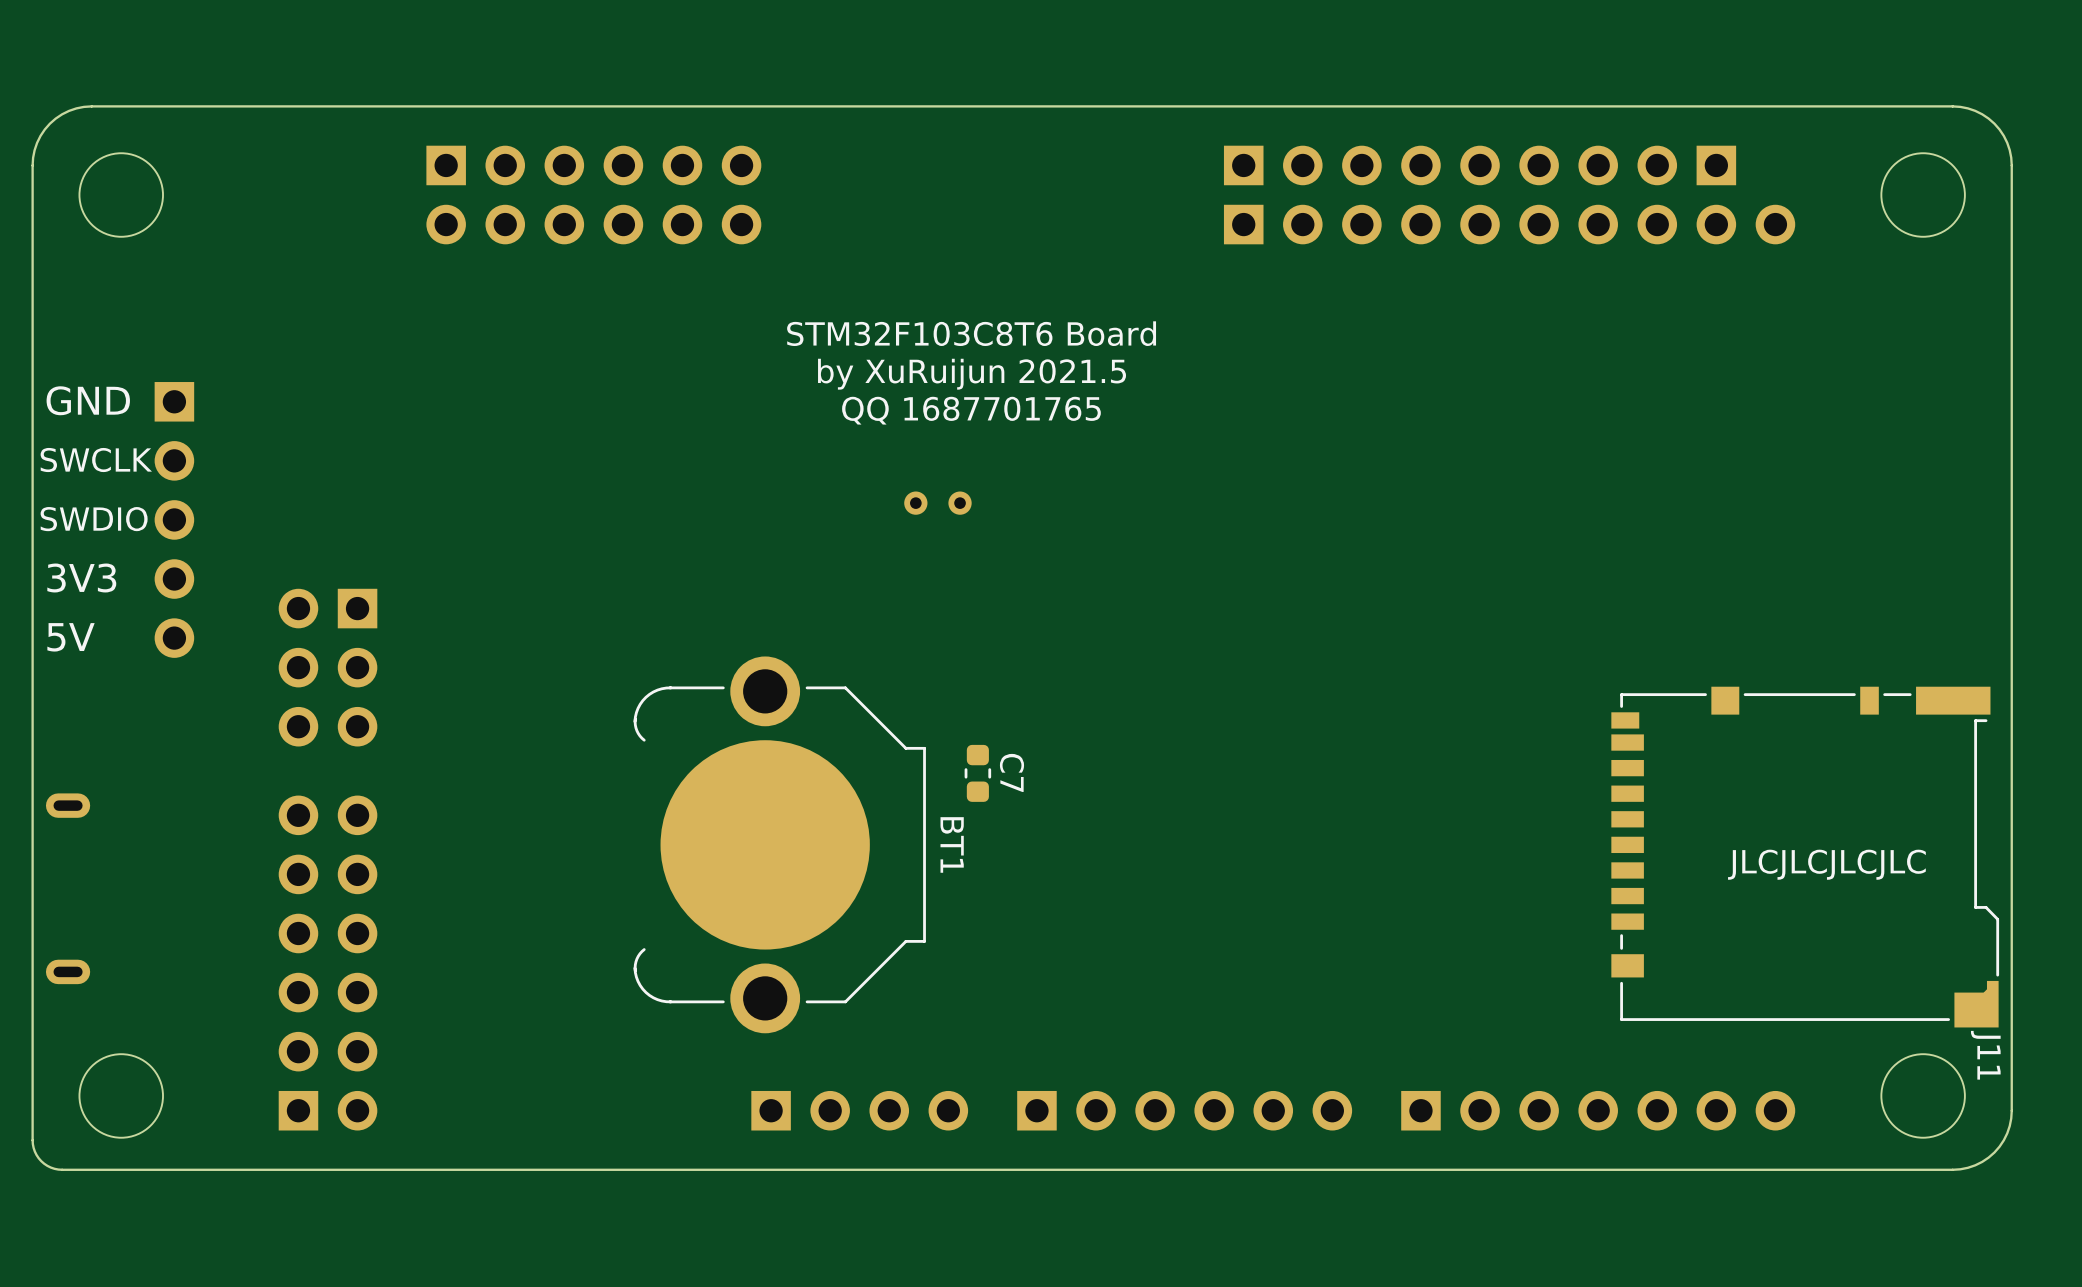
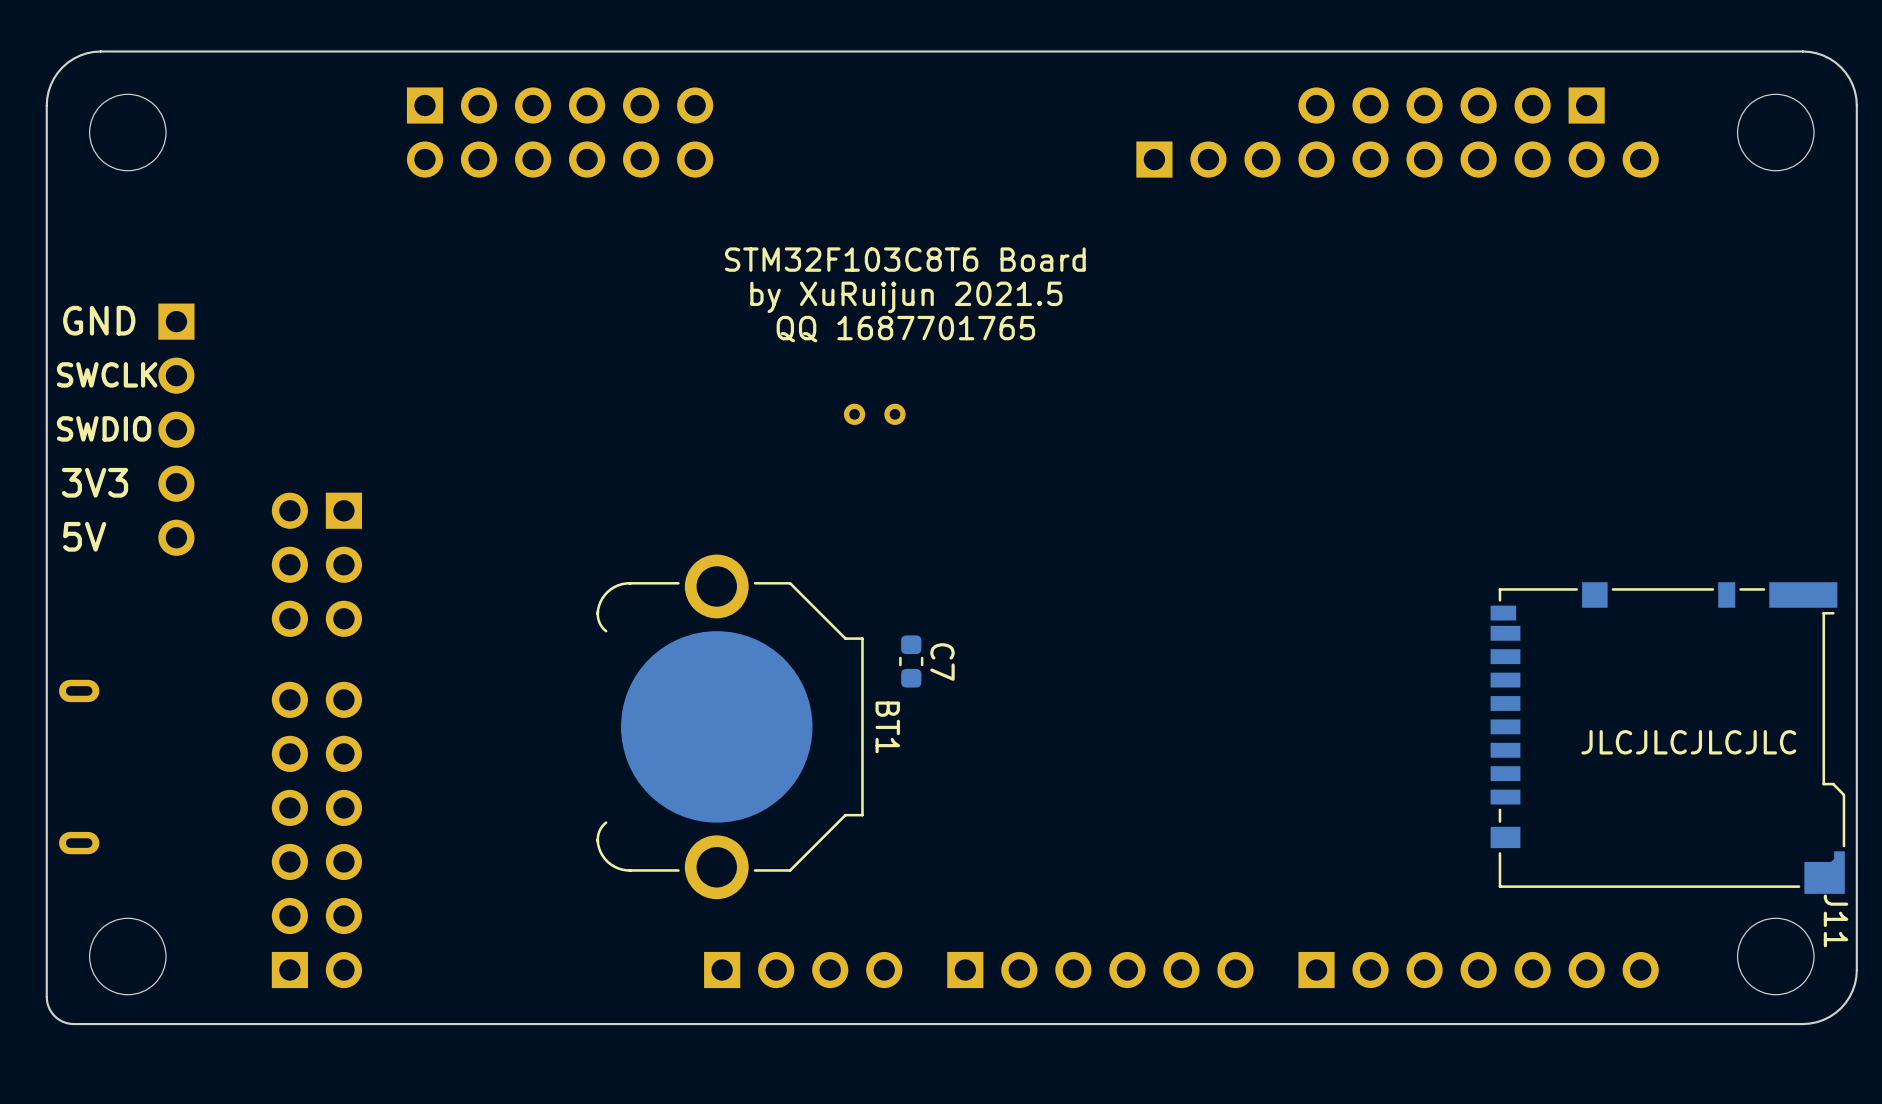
part: (1302, 165) -> none

